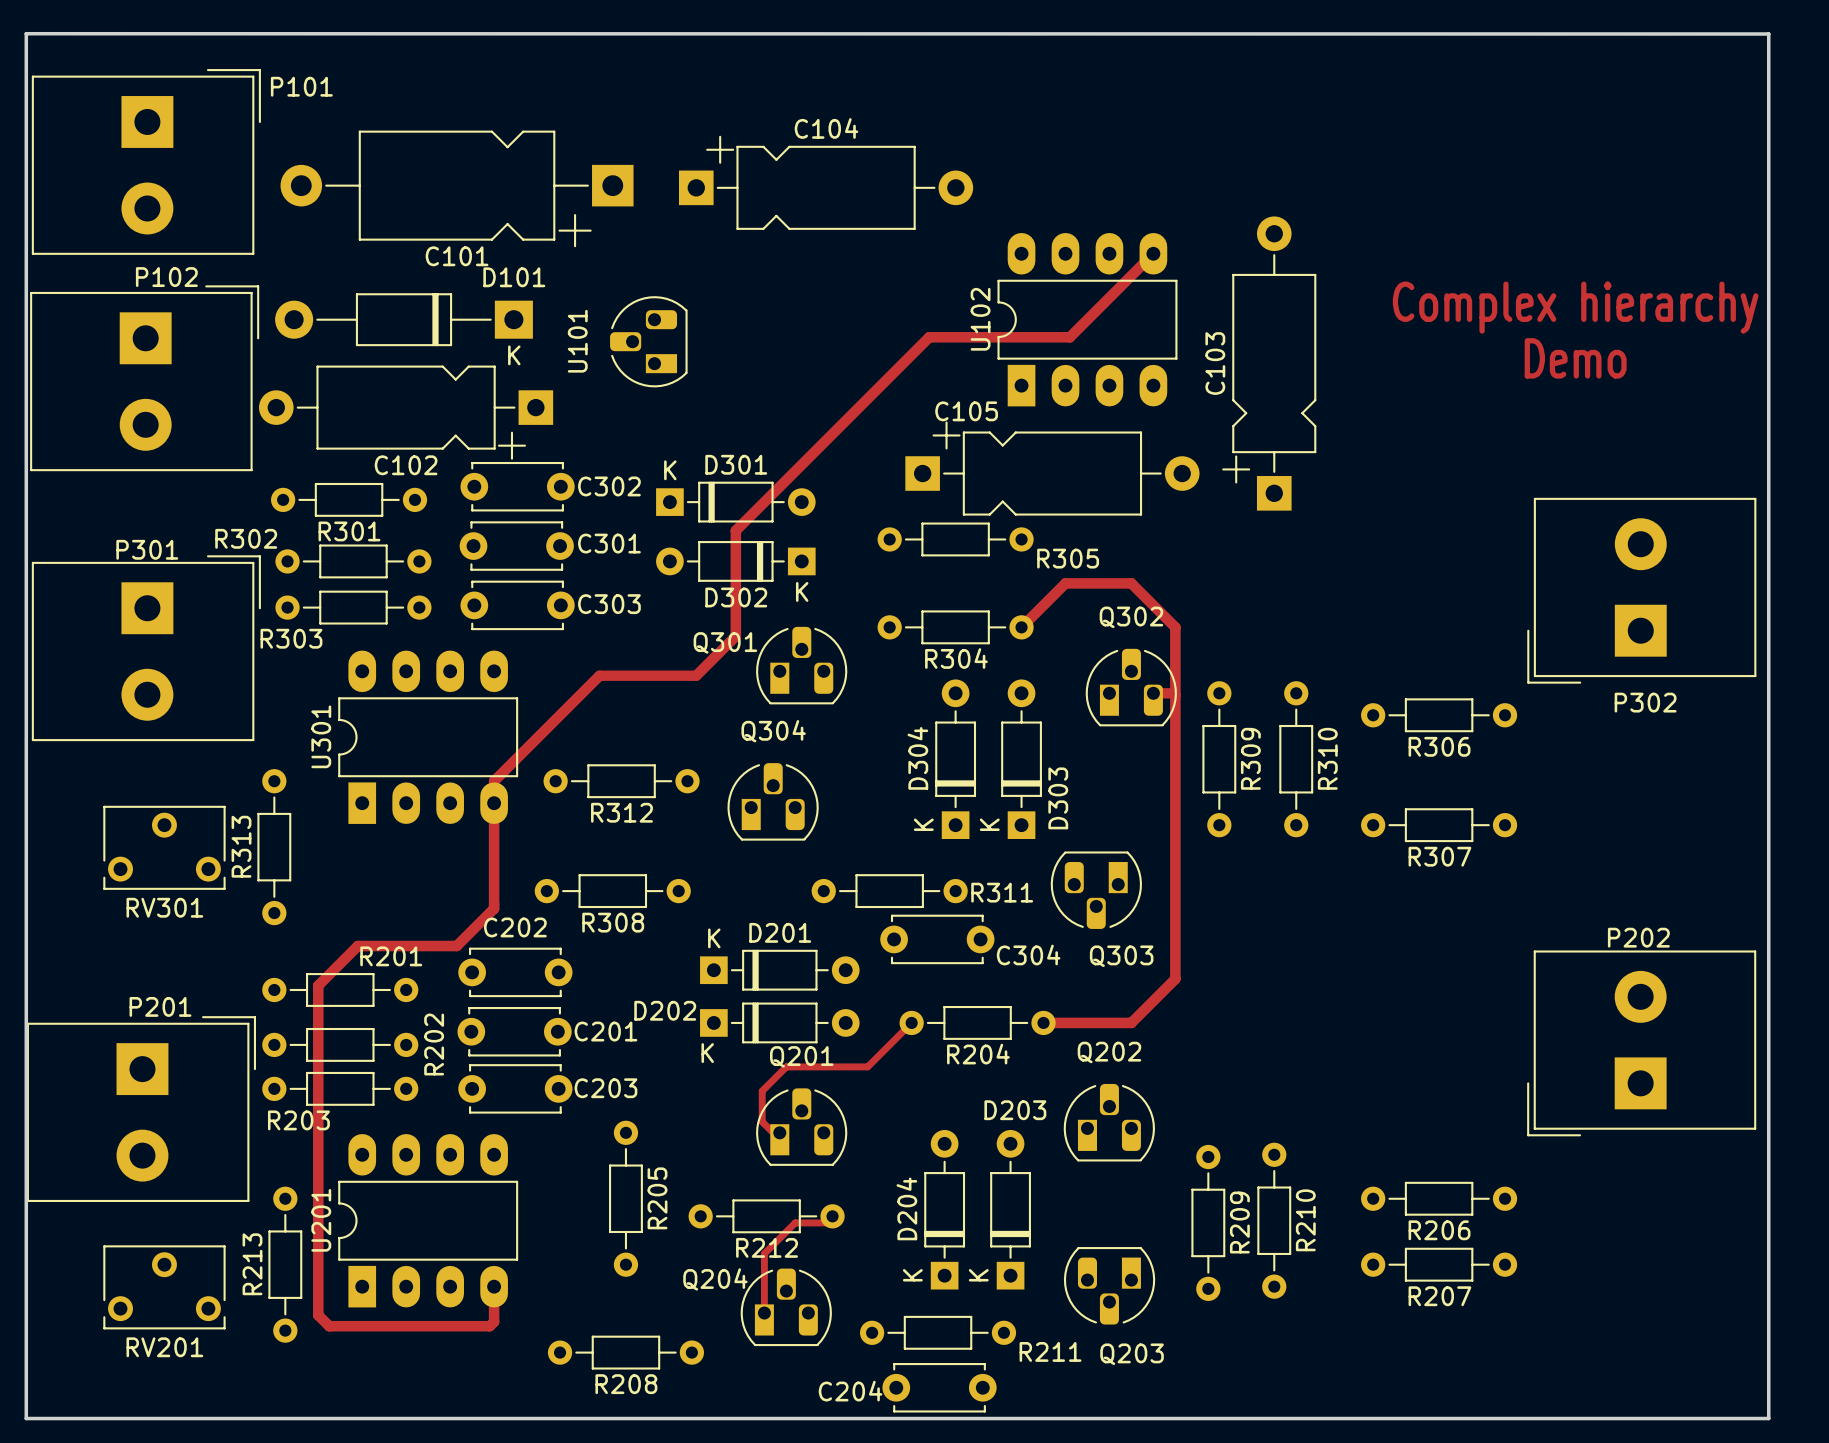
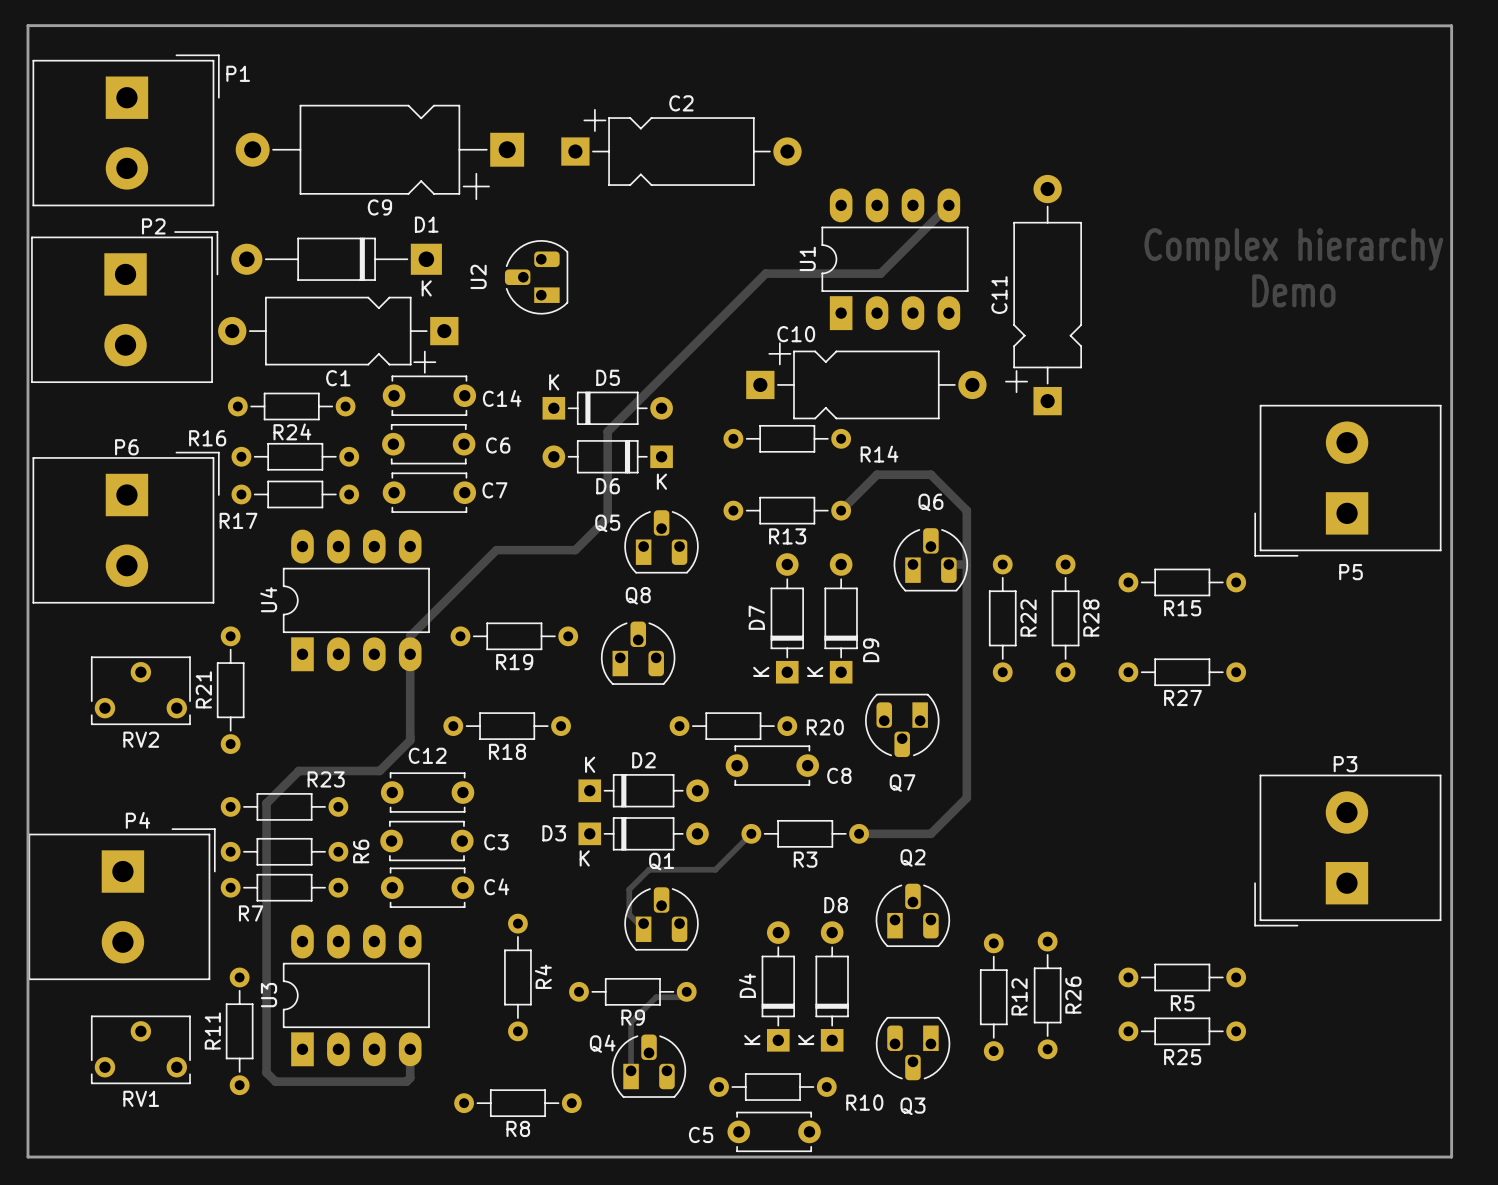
P101 name: P101 (301, 86) -> P1 (238, 73)
C104 name: C104 (826, 128) -> C2 (681, 103)
C101 name: C101 (457, 256) -> C9 (379, 207)
P102 name: P102 (166, 277) -> P2 (153, 226)
D101 name: D101 (514, 277) -> D1 (426, 224)
U102 name: U102 (980, 319) -> U1 (807, 258)
U101 name: U101 (577, 341) -> U2 (478, 276)
C103 name: C103 (1215, 363) -> C11 (999, 295)
C105 name: C105 (966, 411) -> C10 (796, 334)
D301 name: D301 (736, 464) -> D5 (608, 377)
C102 name: C102 (406, 465) -> C1 (338, 378)
C302 name: C302 (609, 486) -> C14 (502, 398)
R301 name: R301 (349, 531) -> R24 (292, 431)
R302 name: R302 (246, 538) -> R16 (207, 438)
C301 name: C301 (609, 543) -> C6 (498, 445)
P301 name: P301 (147, 549) -> P6 (126, 447)
R305 name: R305 (1068, 558) -> R14 (879, 454)
D302 name: D302 (736, 597) -> D6 (608, 486)
C303 name: C303 (609, 604) -> C7 (494, 490)
Q302 name: Q302 (1131, 617) -> Q6 (930, 502)
R303 name: R303 (291, 638) -> R17 (238, 520)
Q301 name: Q301 (725, 642) -> Q5 (607, 523)
R304 name: R304 (956, 658) -> R13 (787, 536)
P302 name: P302 (1645, 702) -> P5 (1351, 572)
Q304 name: Q304 (773, 731) -> Q8 (638, 595)
U301 name: U301 (321, 736) -> U4 (268, 599)
R306 name: R306 (1439, 746) -> R15 (1182, 608)
D304 name: D304 (917, 758) -> D7 (756, 617)
R309 name: R309 (1250, 758) -> R22 (1028, 618)
R310 name: R310 (1327, 758) -> R28 (1091, 618)
D303 name: D303 (1058, 798) -> D9 (871, 650)
R312 name: R312 (621, 812) -> R19 (514, 662)
R313 name: R313 (241, 846) -> R21 (203, 689)
R307 name: R307 (1439, 856) -> R27 (1182, 698)
R311 name: R311 (1002, 892) -> R20 (825, 727)
RV301 name: RV301 (164, 907) -> RV2 (141, 739)
R308 name: R308 (613, 922) -> R18 (507, 751)
C202 name: C202 (515, 927) -> C12 (427, 755)
D201 name: D201 (780, 932) -> D2 (643, 760)
P202 name: P202 (1638, 937) -> P3 (1345, 764)
C304 name: C304 (1028, 954) -> C8 (839, 775)
R201 name: R201 (391, 956) -> R23 (326, 779)
Q303 name: Q303 (1121, 956) -> Q7 (902, 783)
P201 name: P201 (160, 1006) -> P4 (137, 820)
D202 name: D202 (665, 1010) -> D3 (554, 833)
C201 name: C201 (605, 1031) -> C3 (496, 842)
R202 name: R202 (434, 1044) -> R6 (361, 851)
Q202 name: Q202 (1109, 1052) -> Q2 (912, 857)
R204 name: R204 (978, 1054) -> R3 (805, 859)
Q201 name: Q201 (801, 1056) -> Q1 (661, 861)
C203 name: C203 (605, 1088) -> C4 (496, 886)
D203 name: D203 (1015, 1110) -> D8 (836, 905)
R203 name: R203 (298, 1120) -> R7 (251, 913)
R205 name: R205 (657, 1198) -> R4 (543, 976)
D204 name: D204 (906, 1208) -> D4 (747, 985)
U201 name: U201 (321, 1220) -> U3 (269, 995)
R210 name: R210 (1305, 1220) -> R26 (1073, 995)
R209 name: R209 (1239, 1222) -> R12 (1019, 996)
R206 name: R206 (1439, 1230) -> R5 (1182, 1003)
R212 name: R212 (767, 1247) -> R9 (633, 1017)
R213 name: R213 (252, 1264) -> R11 (212, 1031)
Q204 name: Q204 (715, 1279) -> Q4 (602, 1043)
R207 name: R207 (1439, 1296) -> R25 (1182, 1057)
RV201 name: RV201 (164, 1347) -> RV1 (141, 1098)
R211 name: R211 (1050, 1351) -> R10 (864, 1102)
Q203 name: Q203 (1132, 1354) -> Q3 (912, 1106)
R208 name: R208 (626, 1384) -> R8 (518, 1128)
C204 name: C204 (850, 1391) -> C5 (701, 1134)

